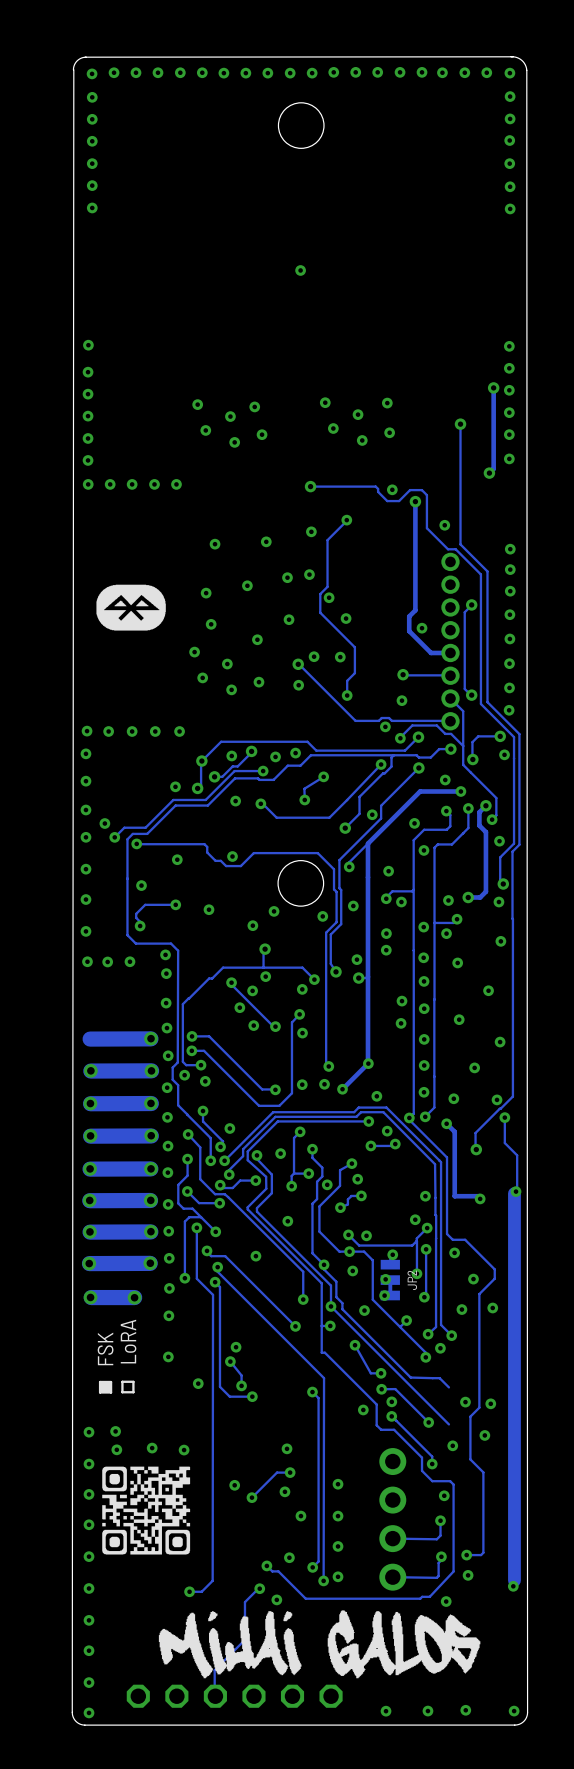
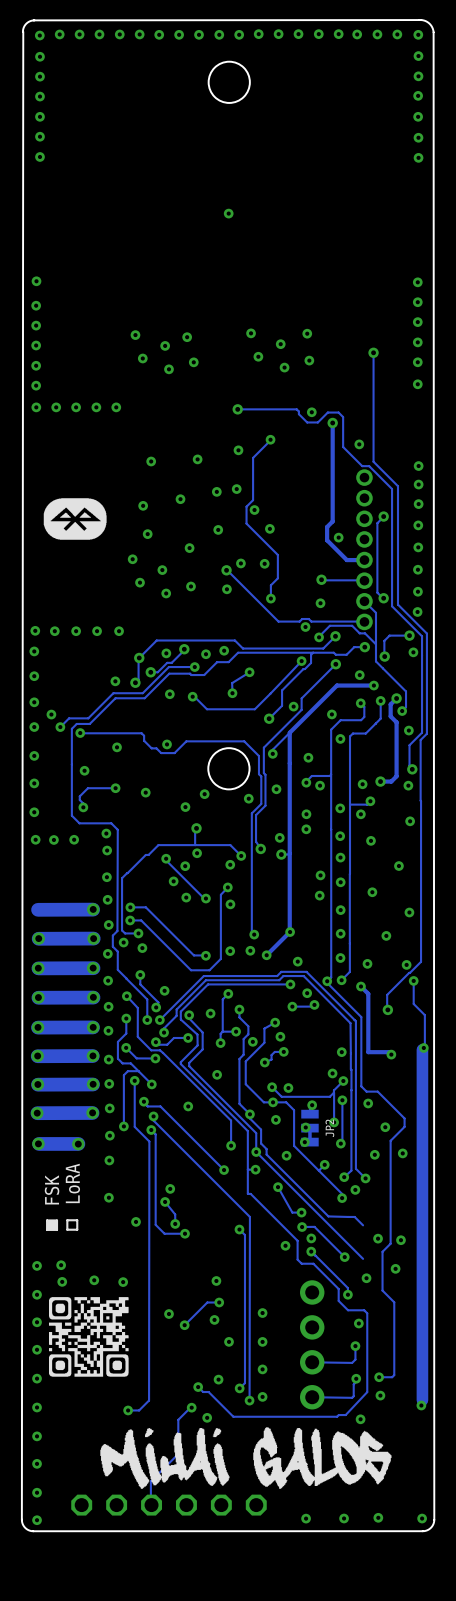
track: (493, 387) (493, 468) (489, 473) -> none
via: (493, 387) -> none
via: (489, 473) -> none

